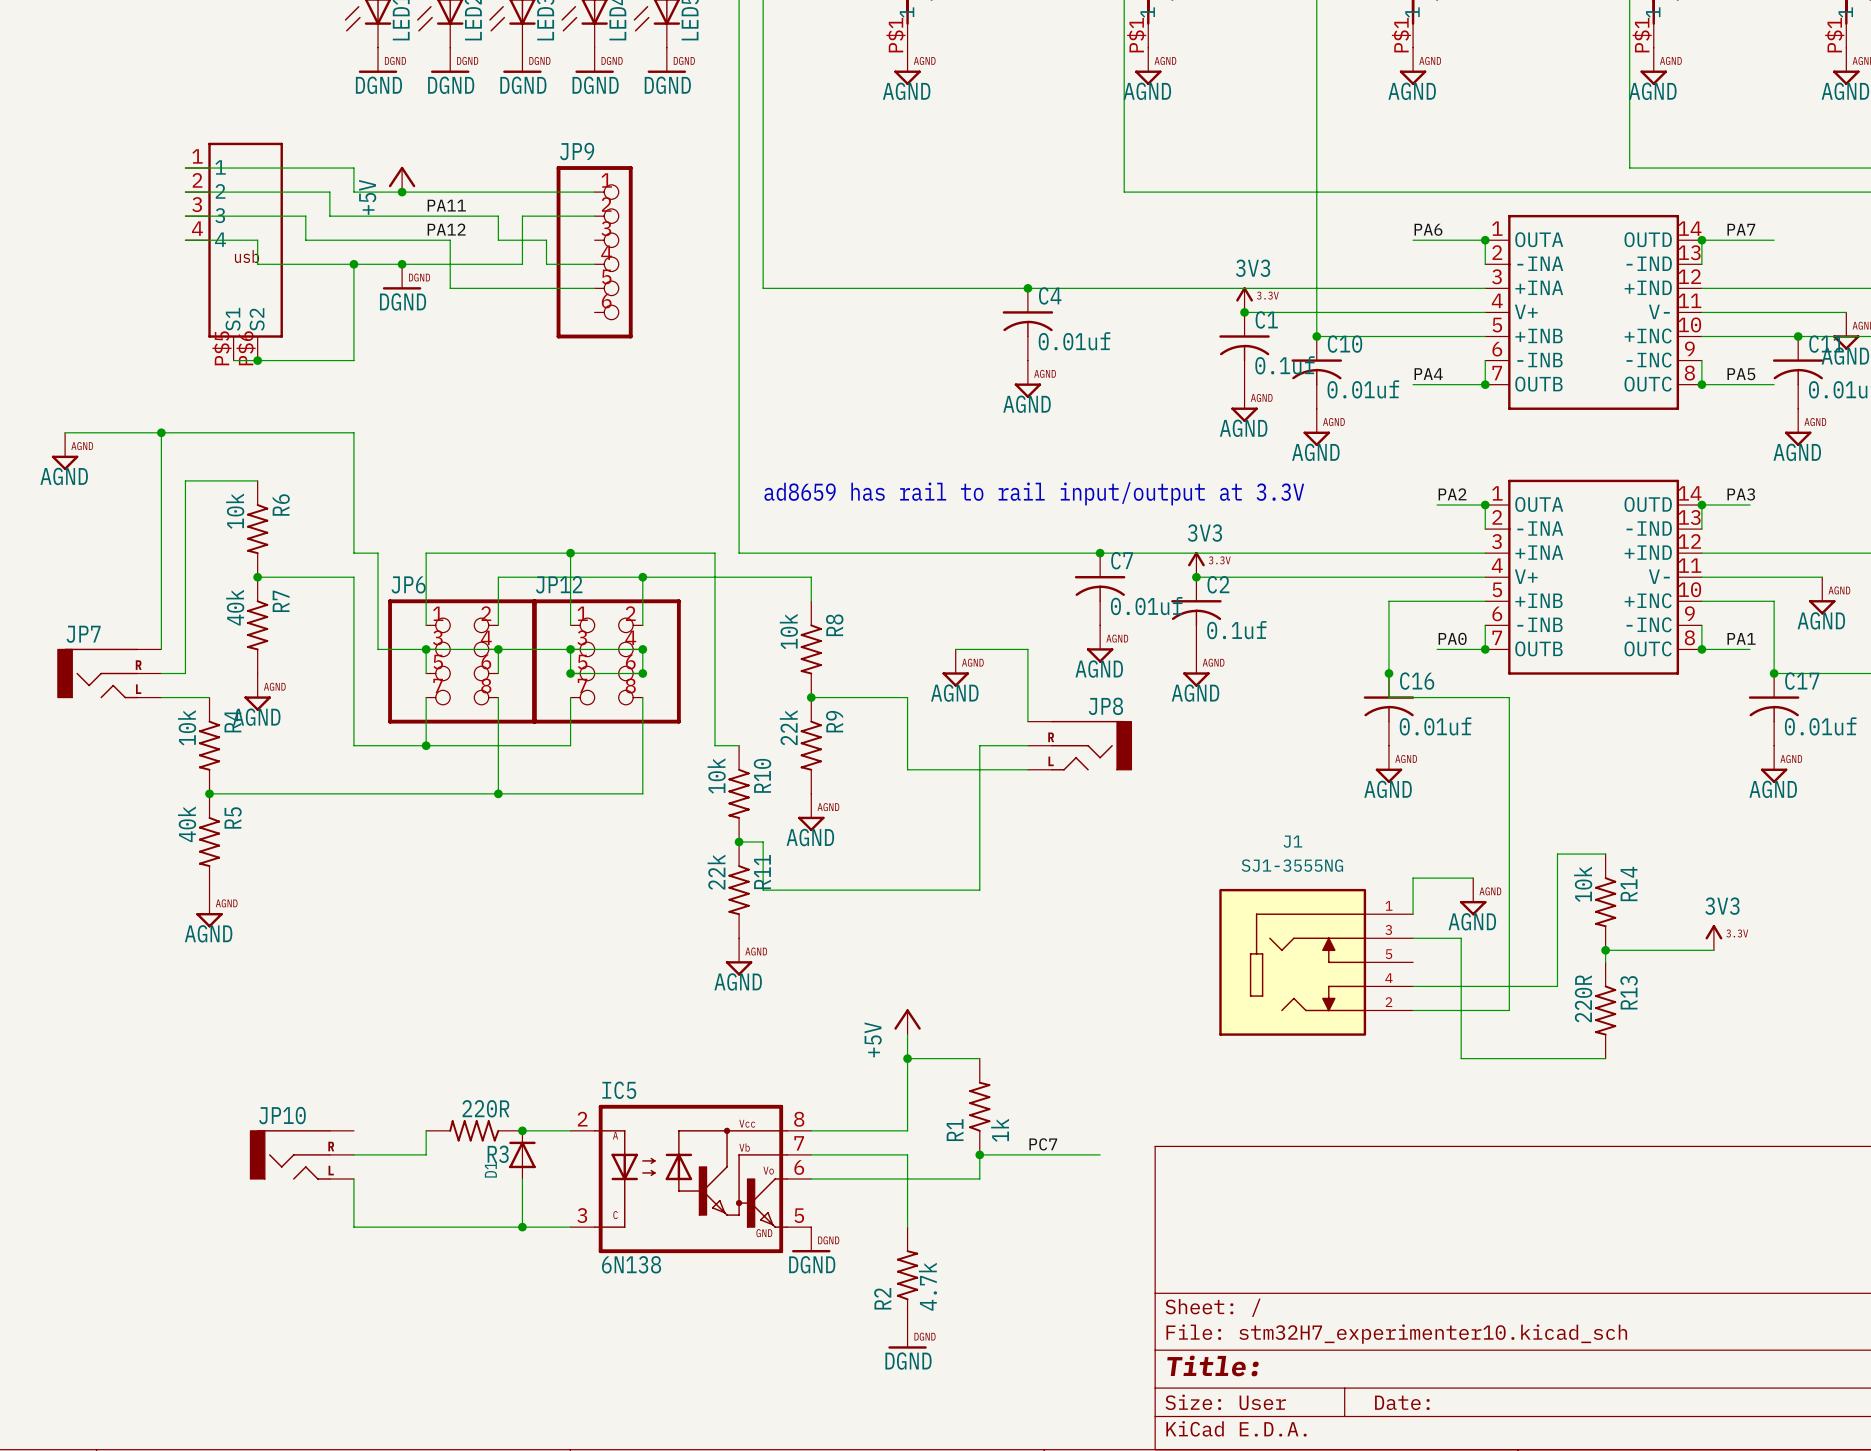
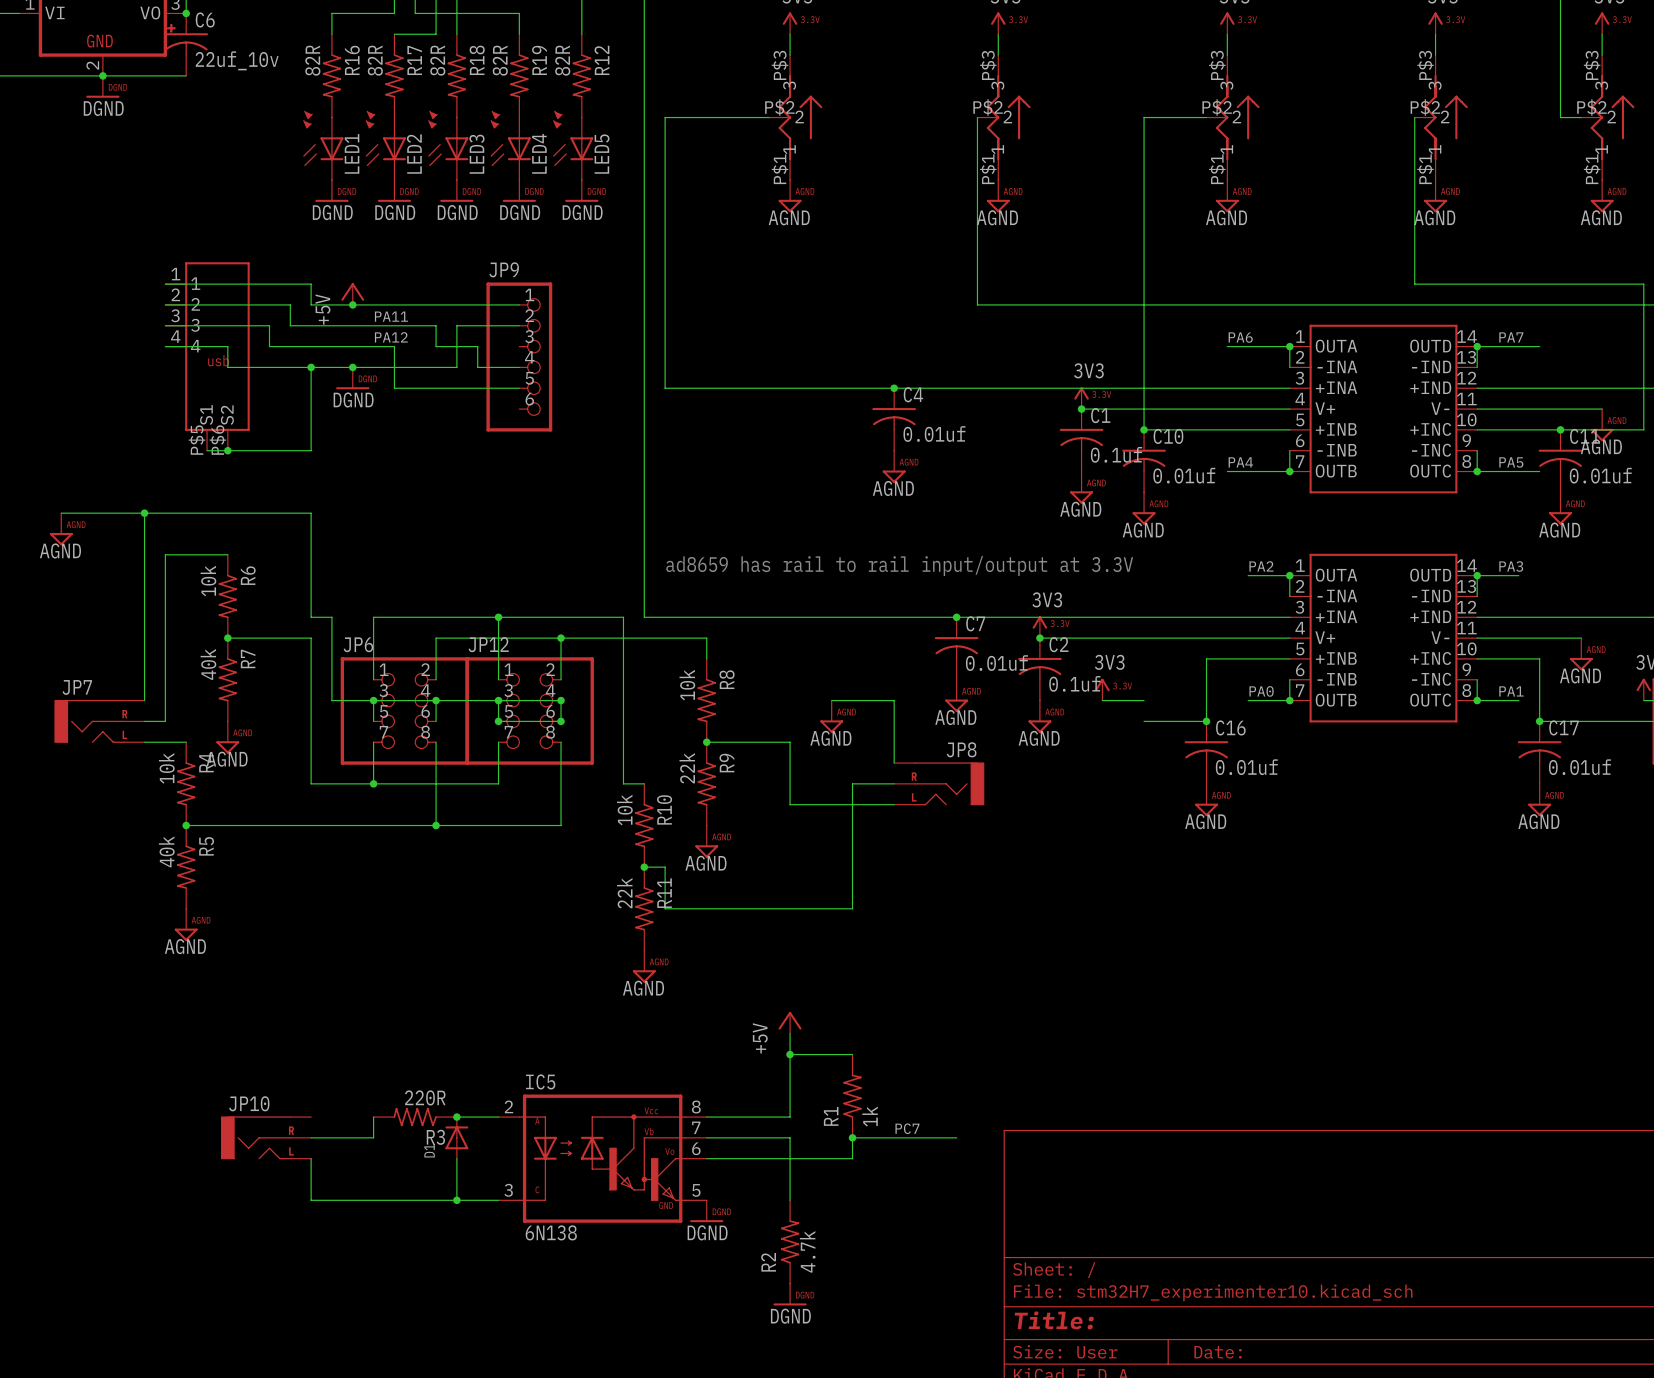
power symbol: none -> 3V3 (1102, 689)
wire: none -> (1102, 700) (1144, 700)
wire: (1388, 673) (1388, 697) (1509, 697) (1509, 1010) (1413, 1010) -> (1206, 721) (1144, 721)
wire: (1605, 854) (1557, 854) (1557, 986) (1413, 986) -> none
wire: (1473, 878) (1413, 878) (1413, 914) -> none
power symbol: AGND (1473, 896) -> none
R14: 10k (1605, 902) -> none
power symbol: 3V3 (1713, 937) -> none
wire: (1413, 938) (1461, 938) (1461, 1058) (1605, 1058) -> none
junction: (1605, 950) -> none
wire: (1713, 950) (1605, 950) (1605, 962) -> none
J1: SJ1-3555NG (1316, 962) -> none
R13: 220R (1605, 1010) -> none

